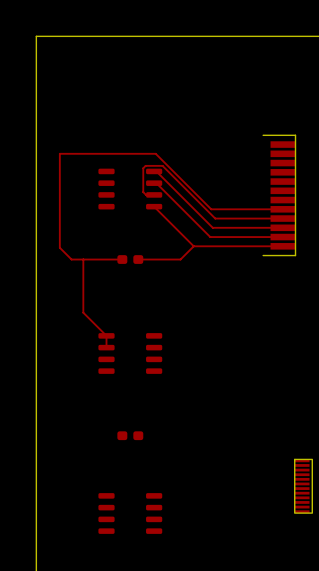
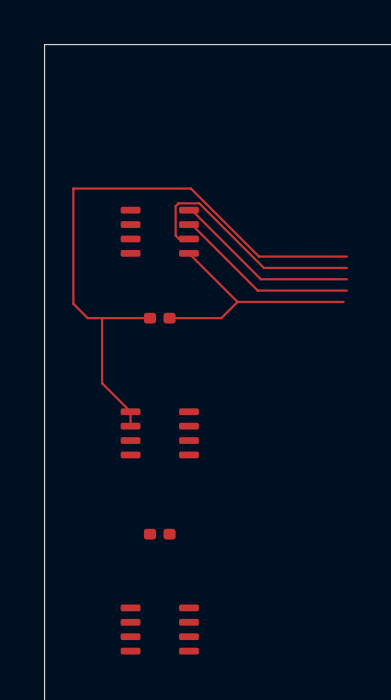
part: (279, 195) -> none
part: (303, 486) -> none

